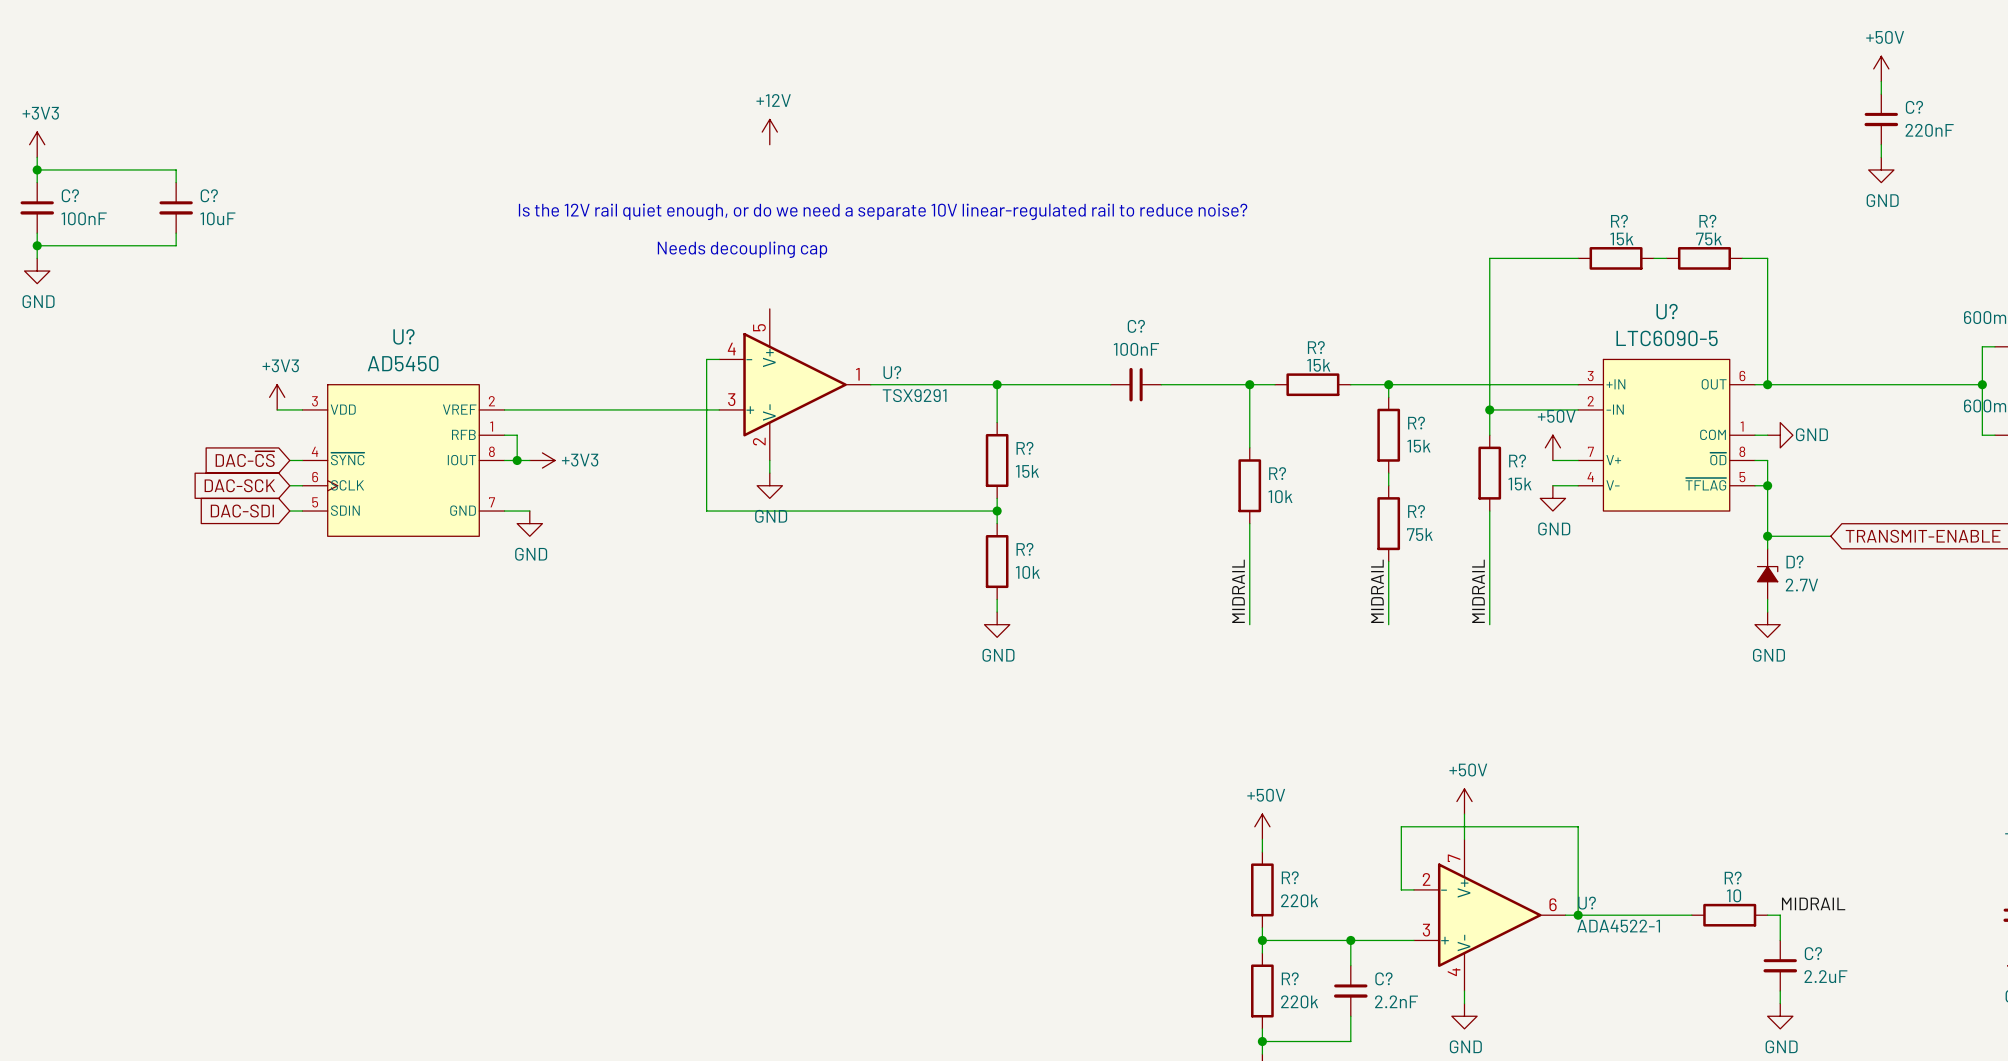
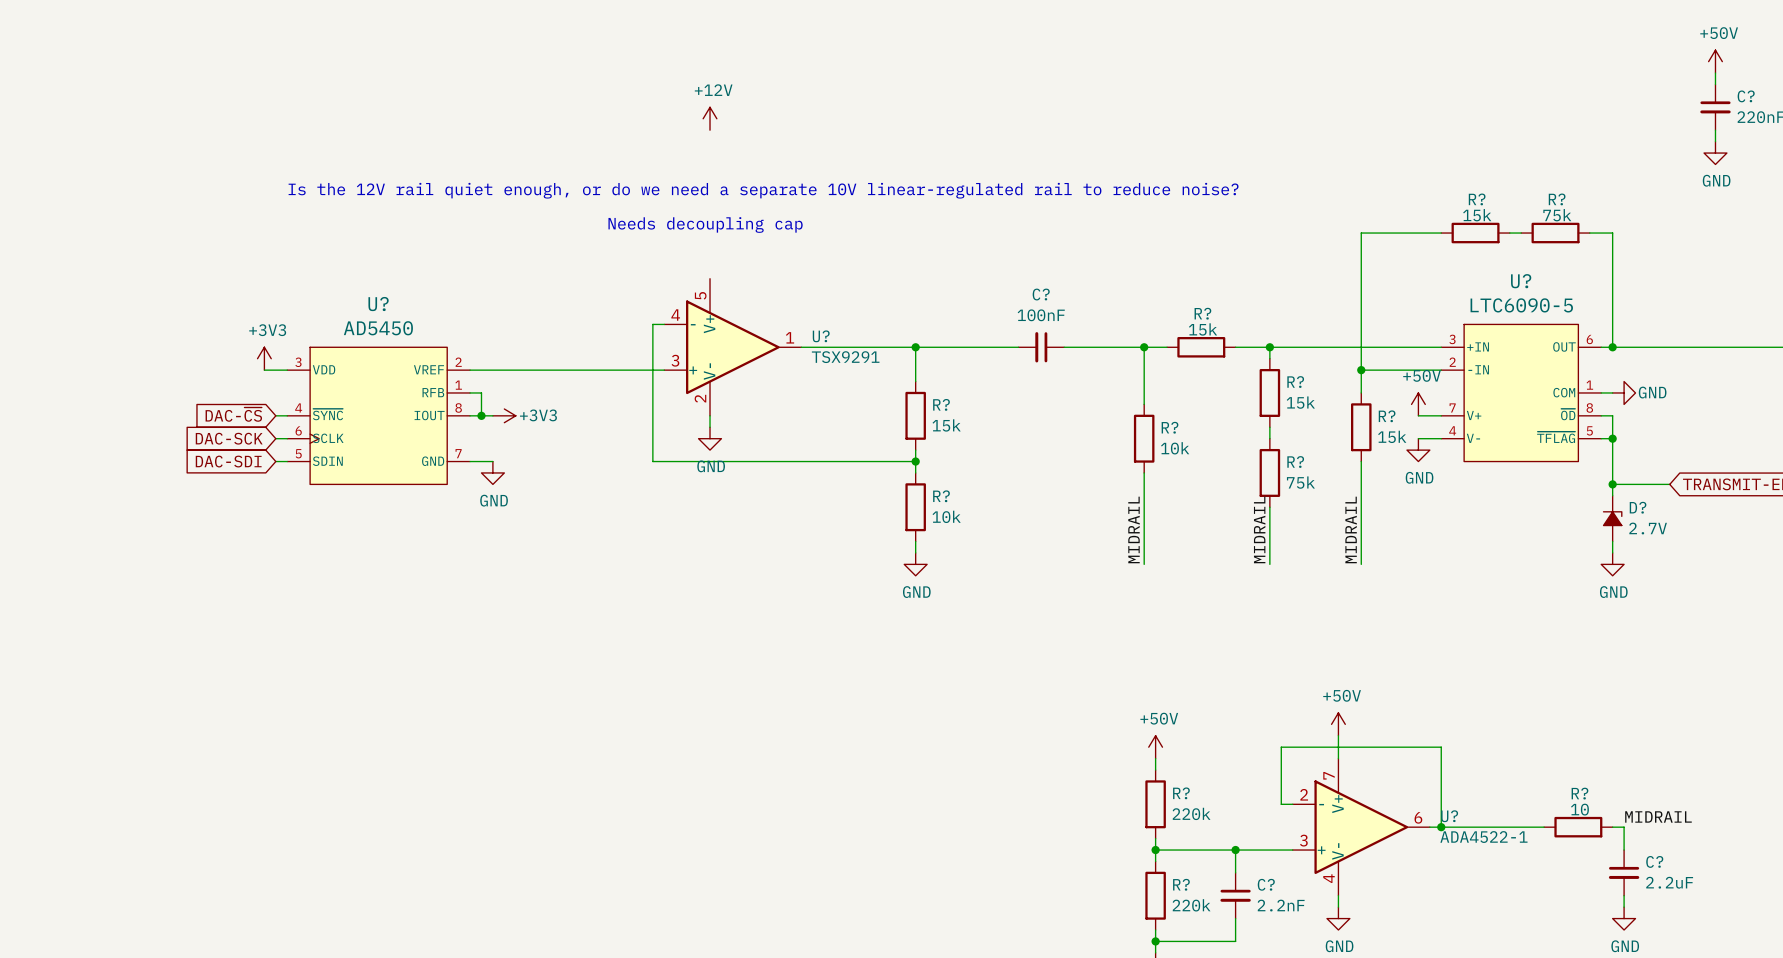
power symbol: +3V3 (37, 144) -> none
wire: (37, 157) (37, 182) -> none
wire: (37, 169) (176, 169) (176, 182) -> none
junction: (37, 169) -> none
C?: 100nF (37, 207) -> none
C?: 10uF (176, 207) -> none
text position: Is the 12V rail quiet enough, or do we need a separate 10V linear-regulated rail to reduce noise? (883, 211) -> Is the 12V rail quiet enough, or do we need a separate 10V linear-regulated rail to reduce noise? (763, 190)
wire: (37, 233) (37, 258) -> none
wire: (176, 233) (176, 245) (37, 245) -> none
junction: (37, 245) -> none
power symbol: GND (37, 271) -> none

